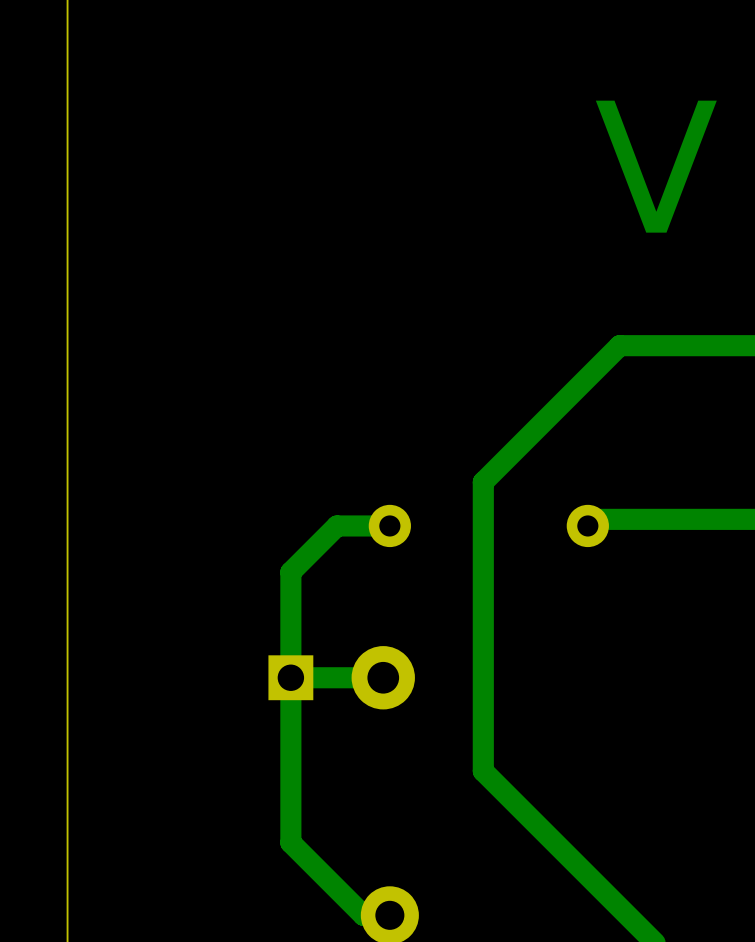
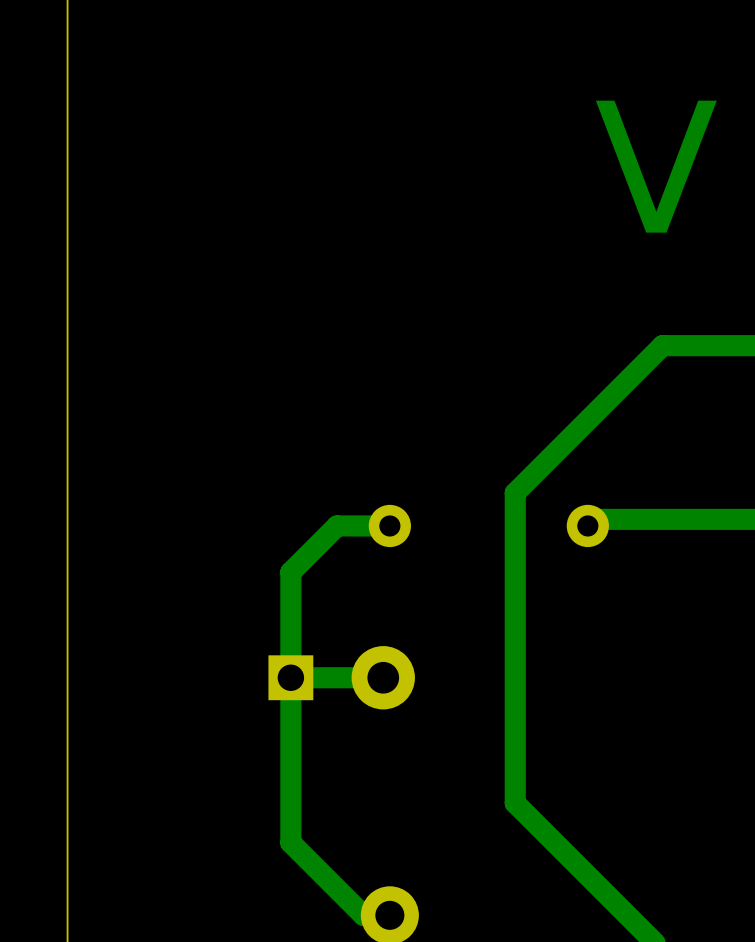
bottom track: (662, 345) (619, 345) (483, 482) (483, 771) (515, 803) -> (662, 345) (515, 492) (515, 803)

